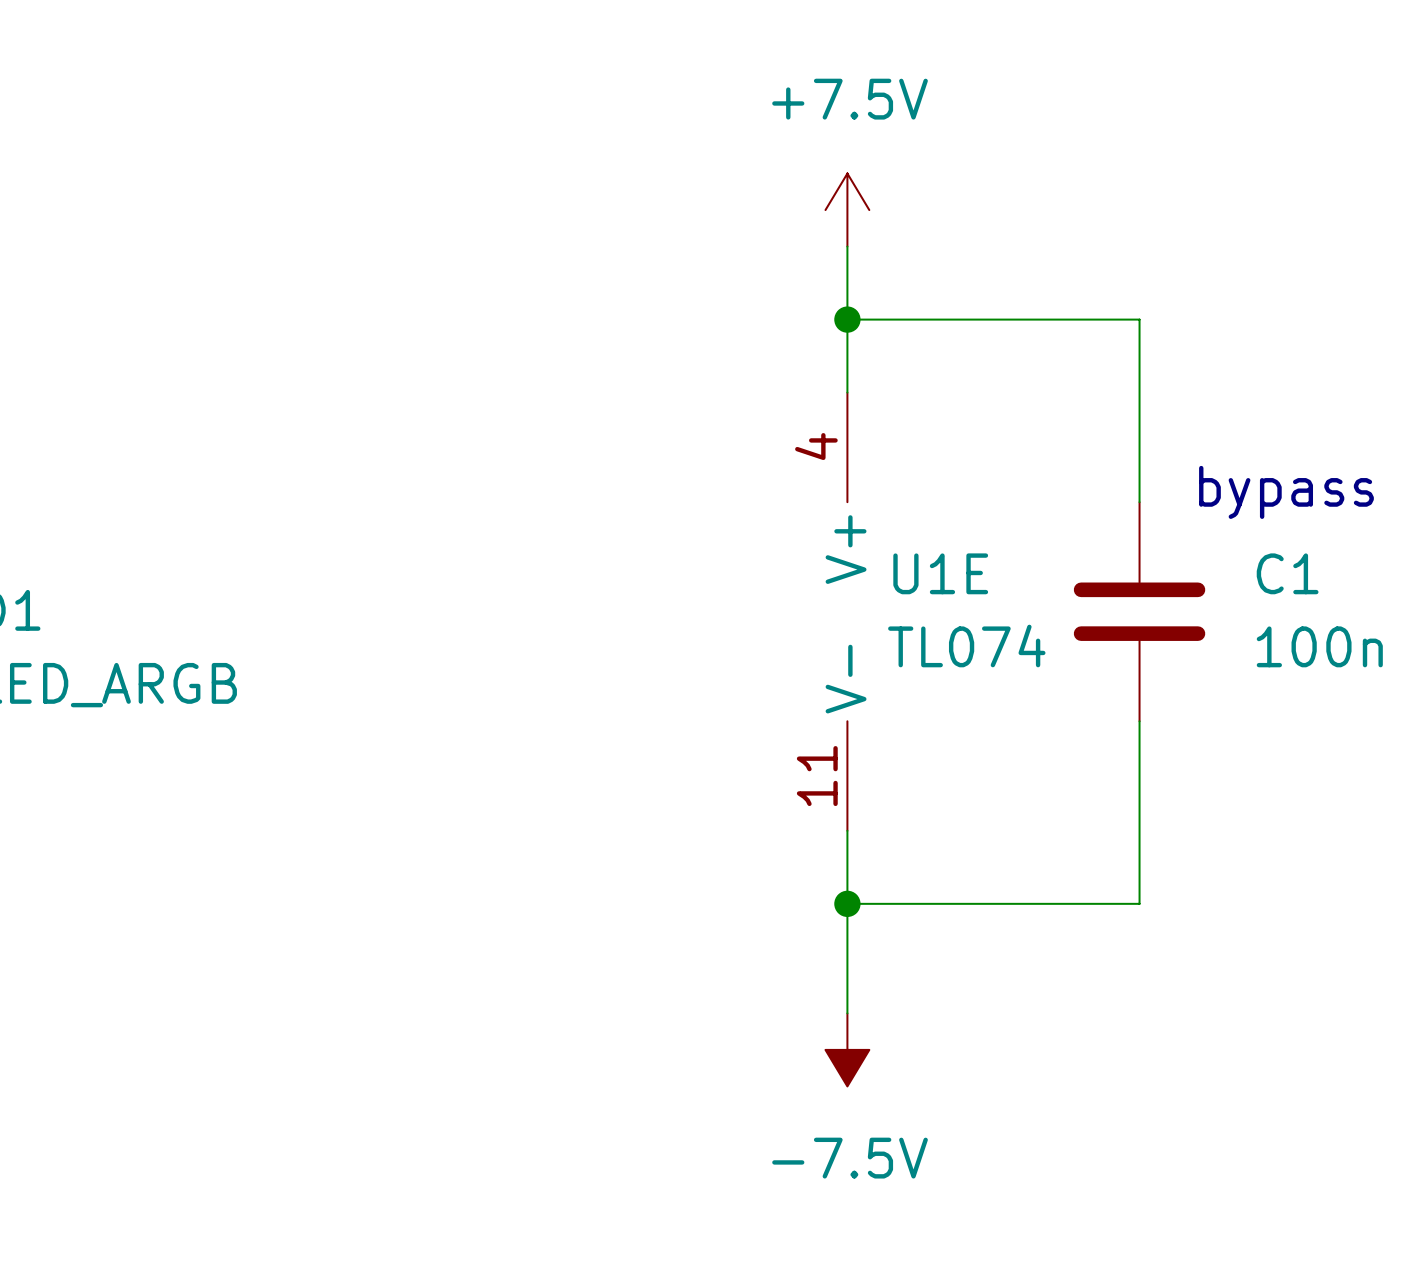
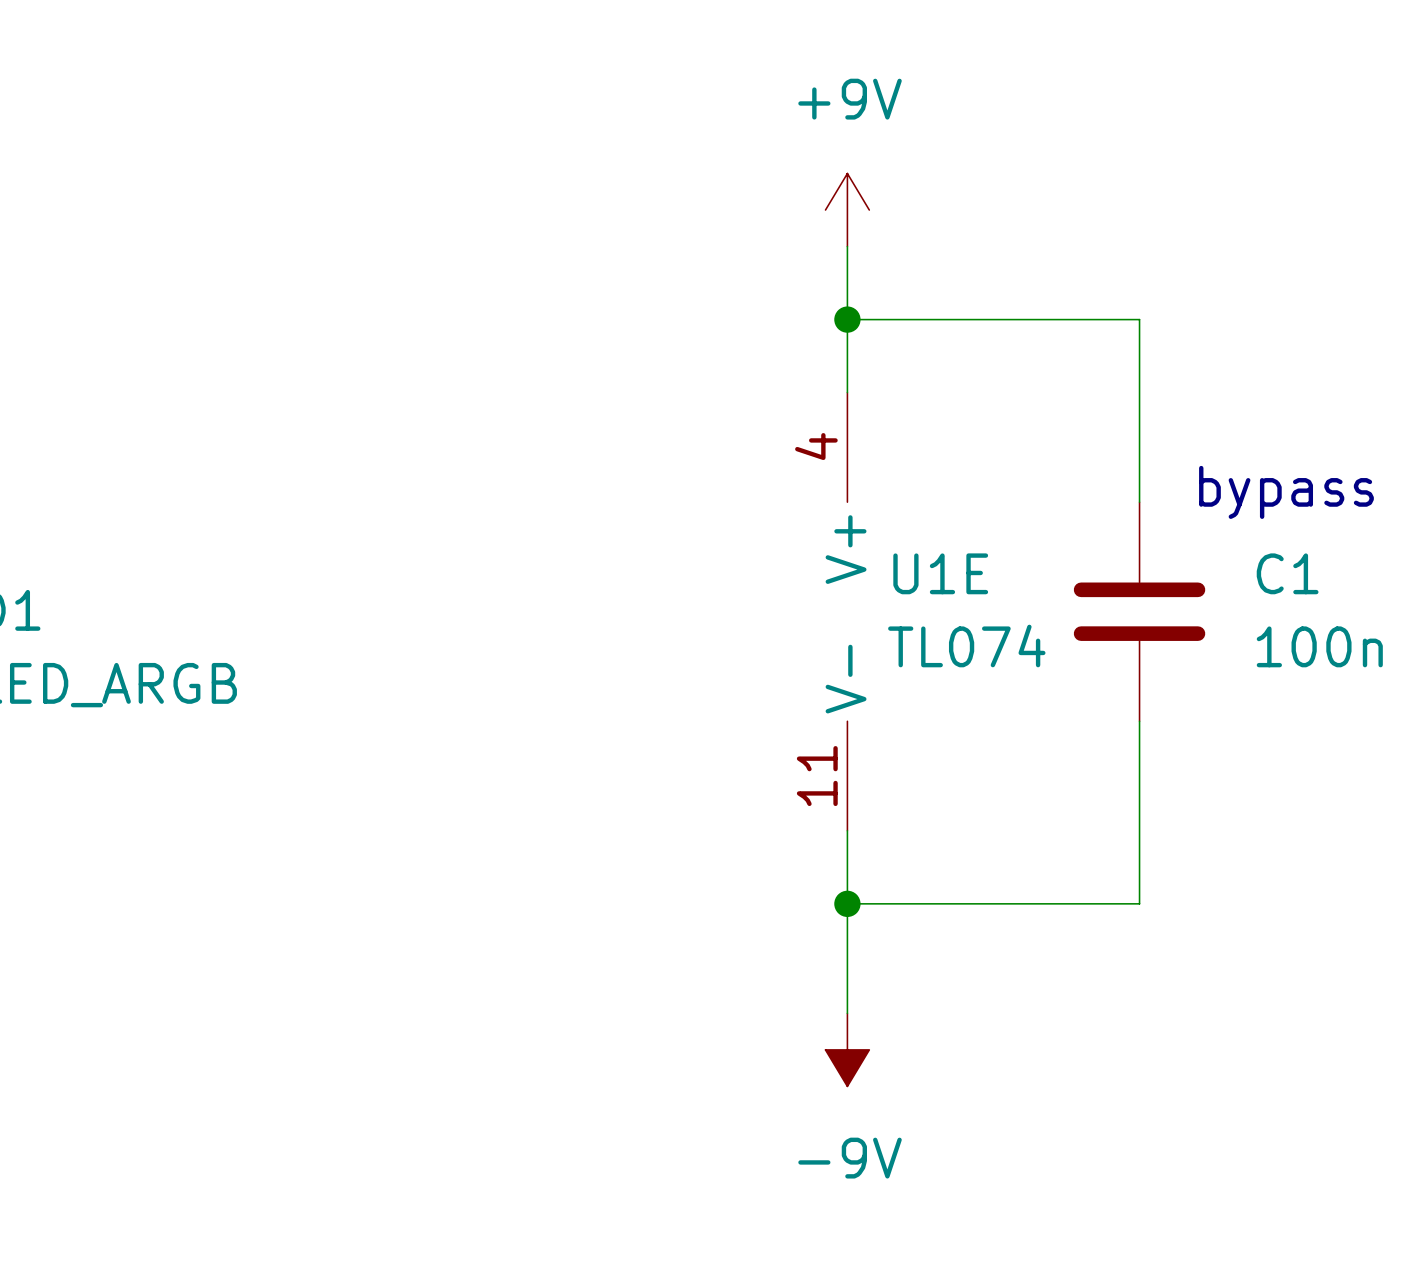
power symbol: +7.5V (847, 210) -> +9V (847, 210)
power symbol: -7.5V (847, 1049) -> -9V (847, 1049)

